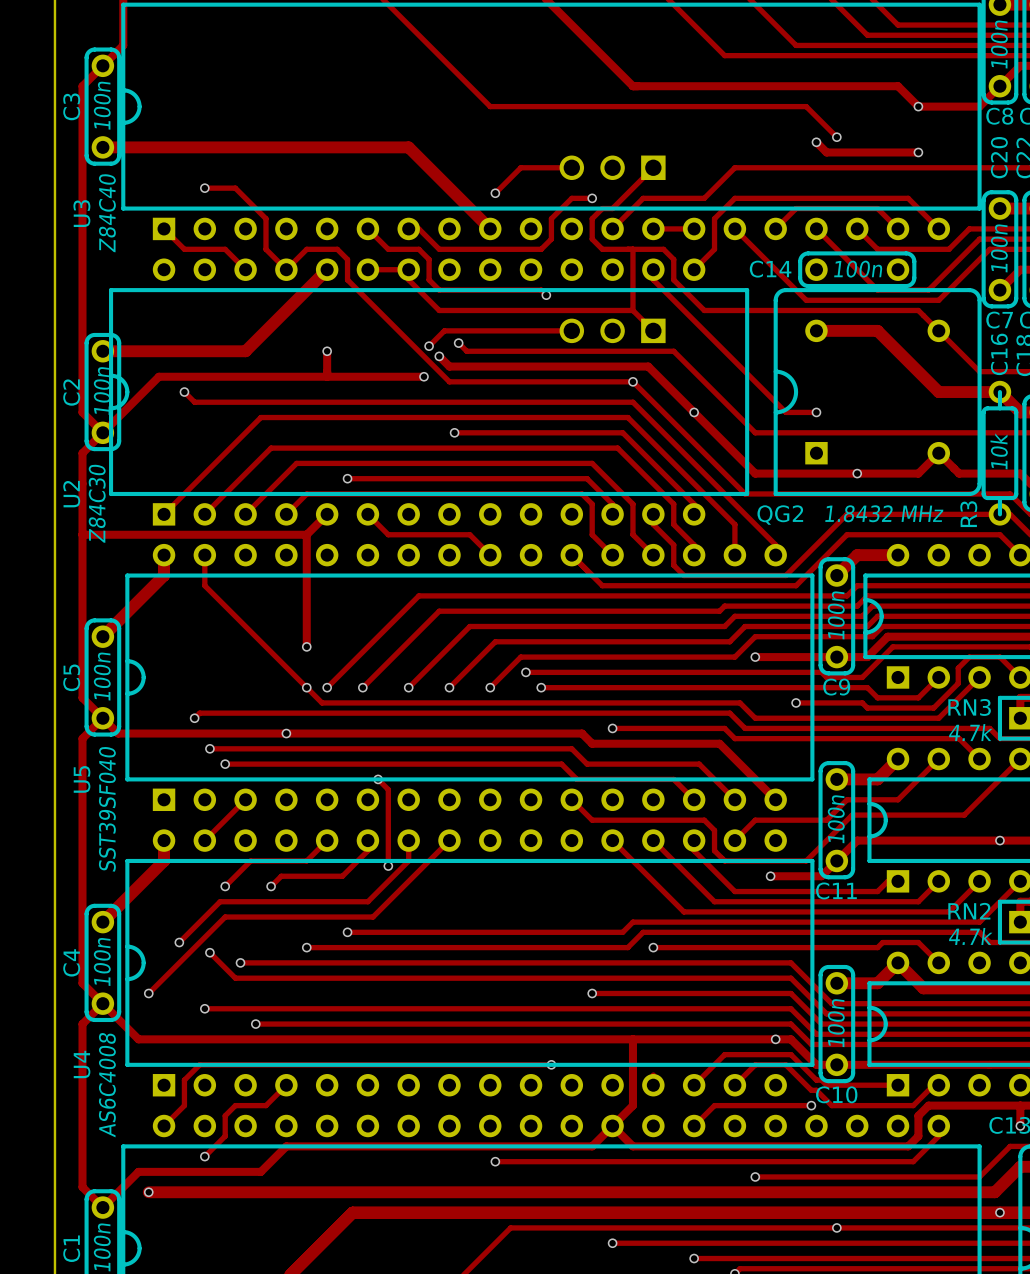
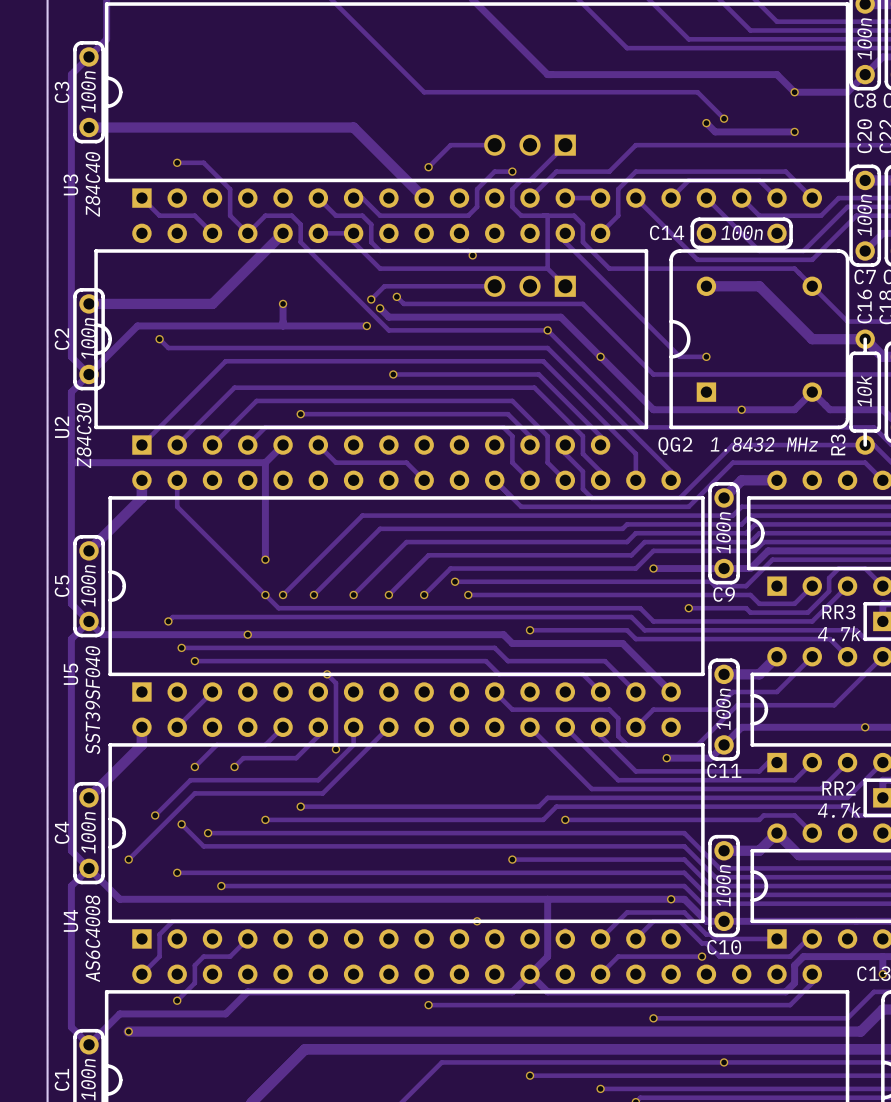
RN3 name: RN3 (969, 707) -> RR3 (838, 612)
RN2 name: RN2 (969, 911) -> RR2 (839, 788)
via: (999, 1212) -> none

